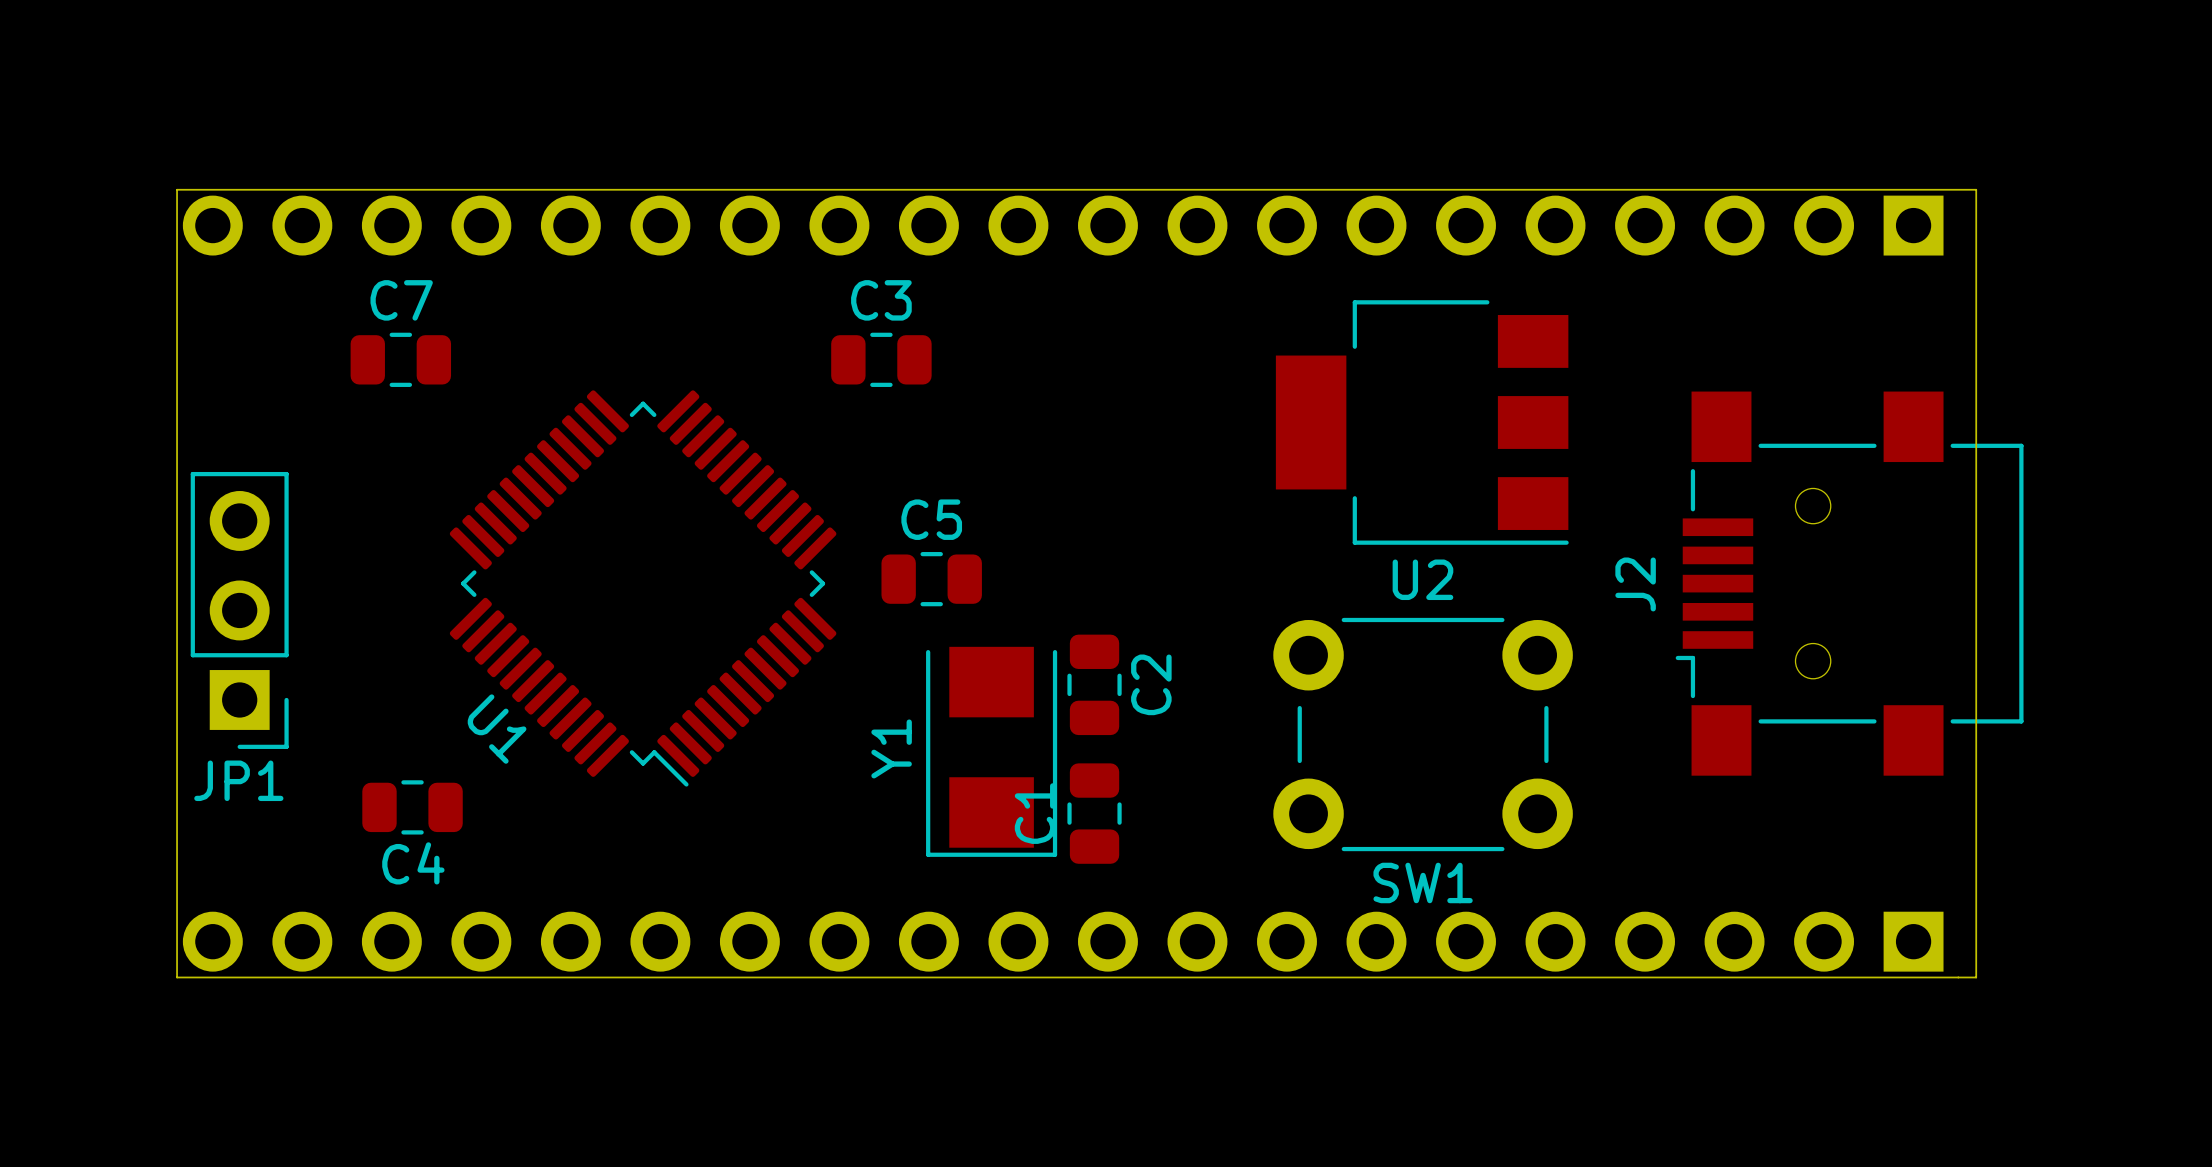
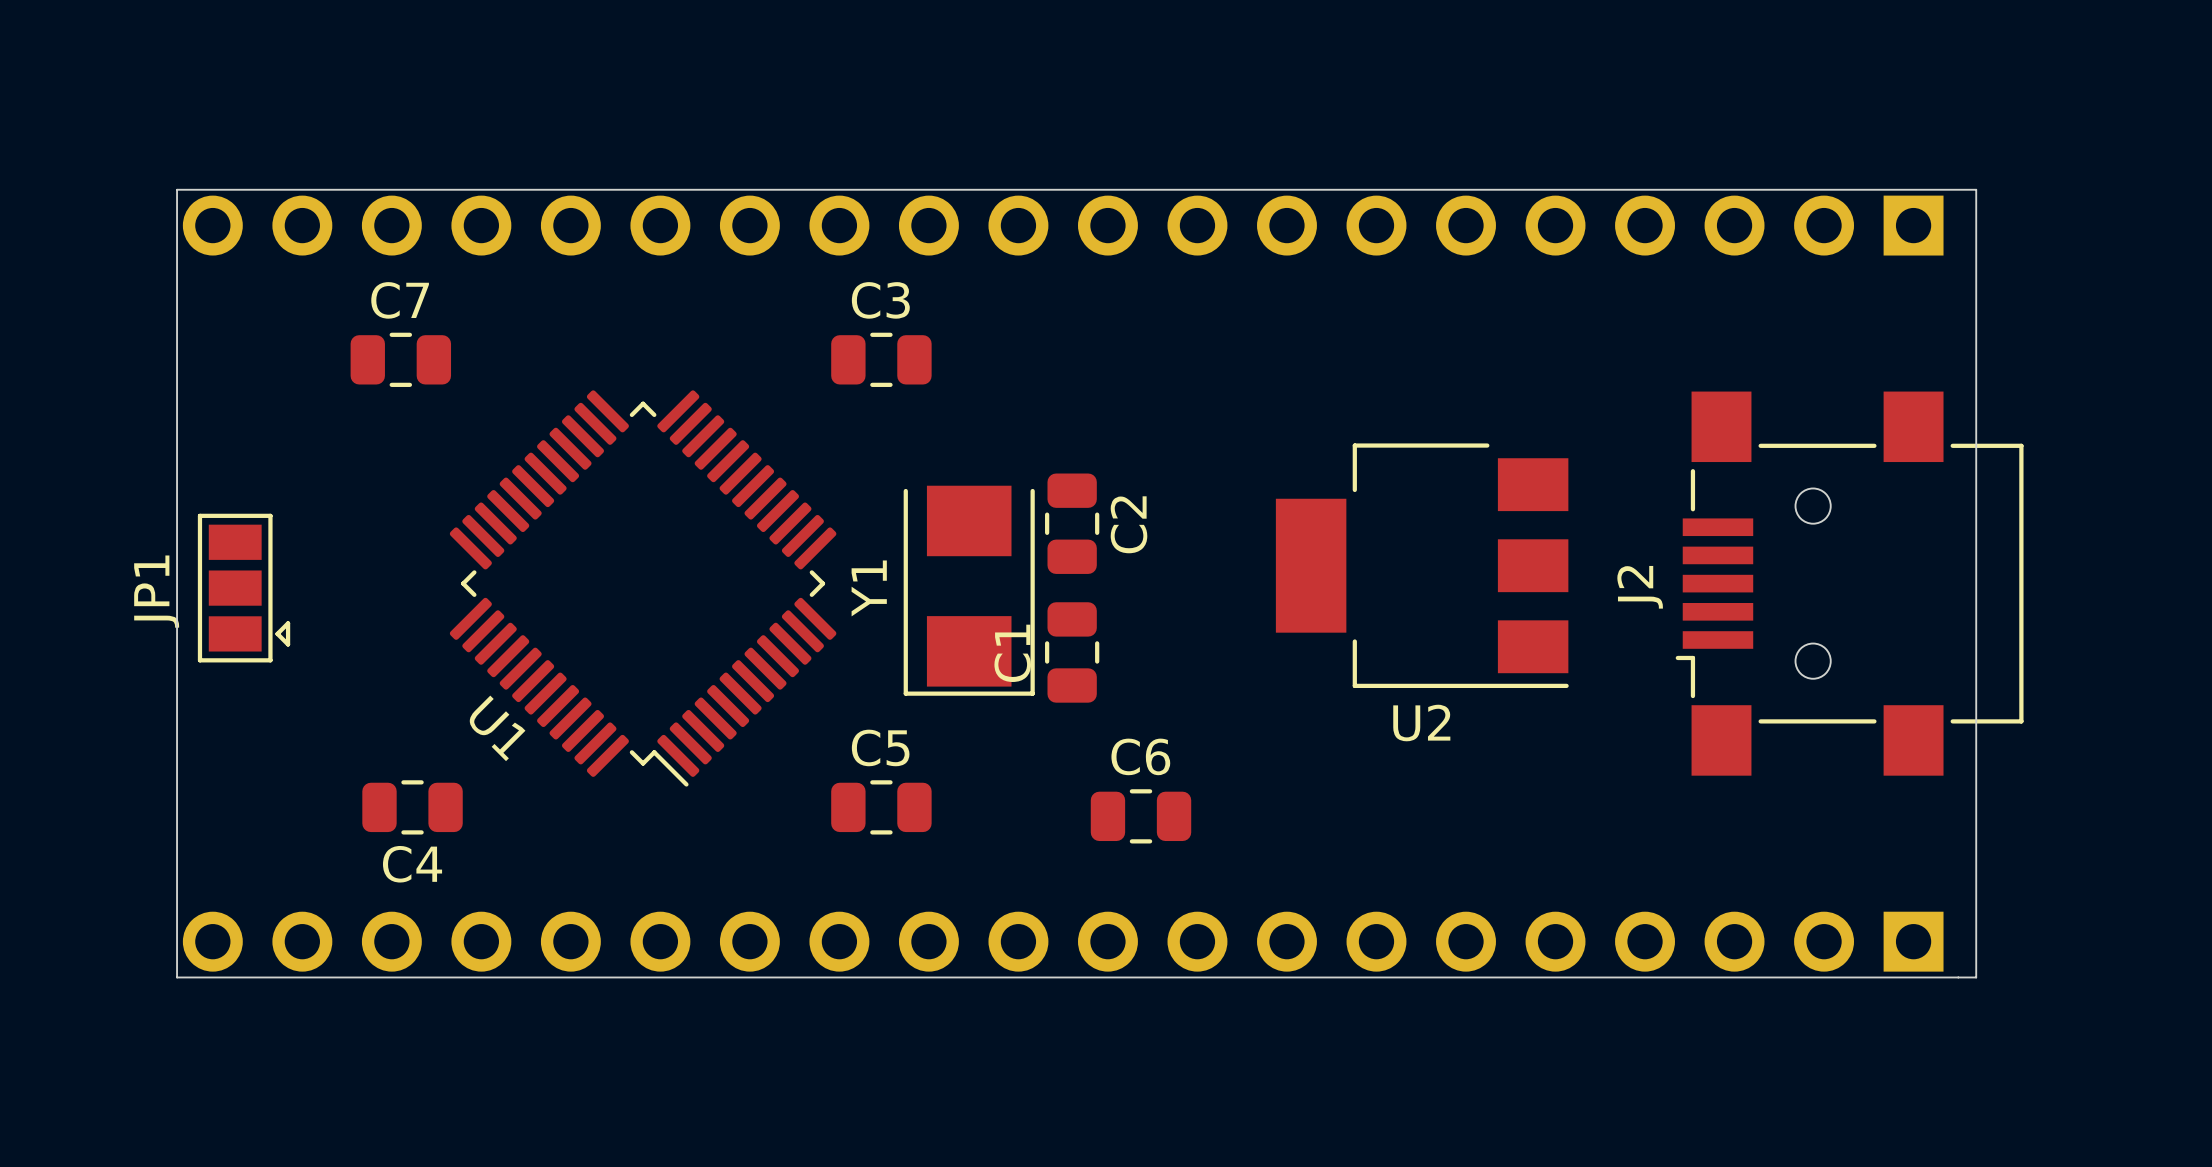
U2 position: (1422, 422) -> (1422, 565)
JP1 footprint: [190, 471, 289, 749] -> [197, 513, 291, 663]
C5 position: (931, 579) -> (881, 807)
C2 position: (1094, 684) -> (1072, 523)
SW1: (1423, 734) -> none
Y1 position: (991, 751) -> (969, 590)
JP1 name position: JP1 (238, 780) -> JP1 (156, 591)
C1 position: (1094, 813) -> (1072, 652)
C6: none -> (1140, 816)

